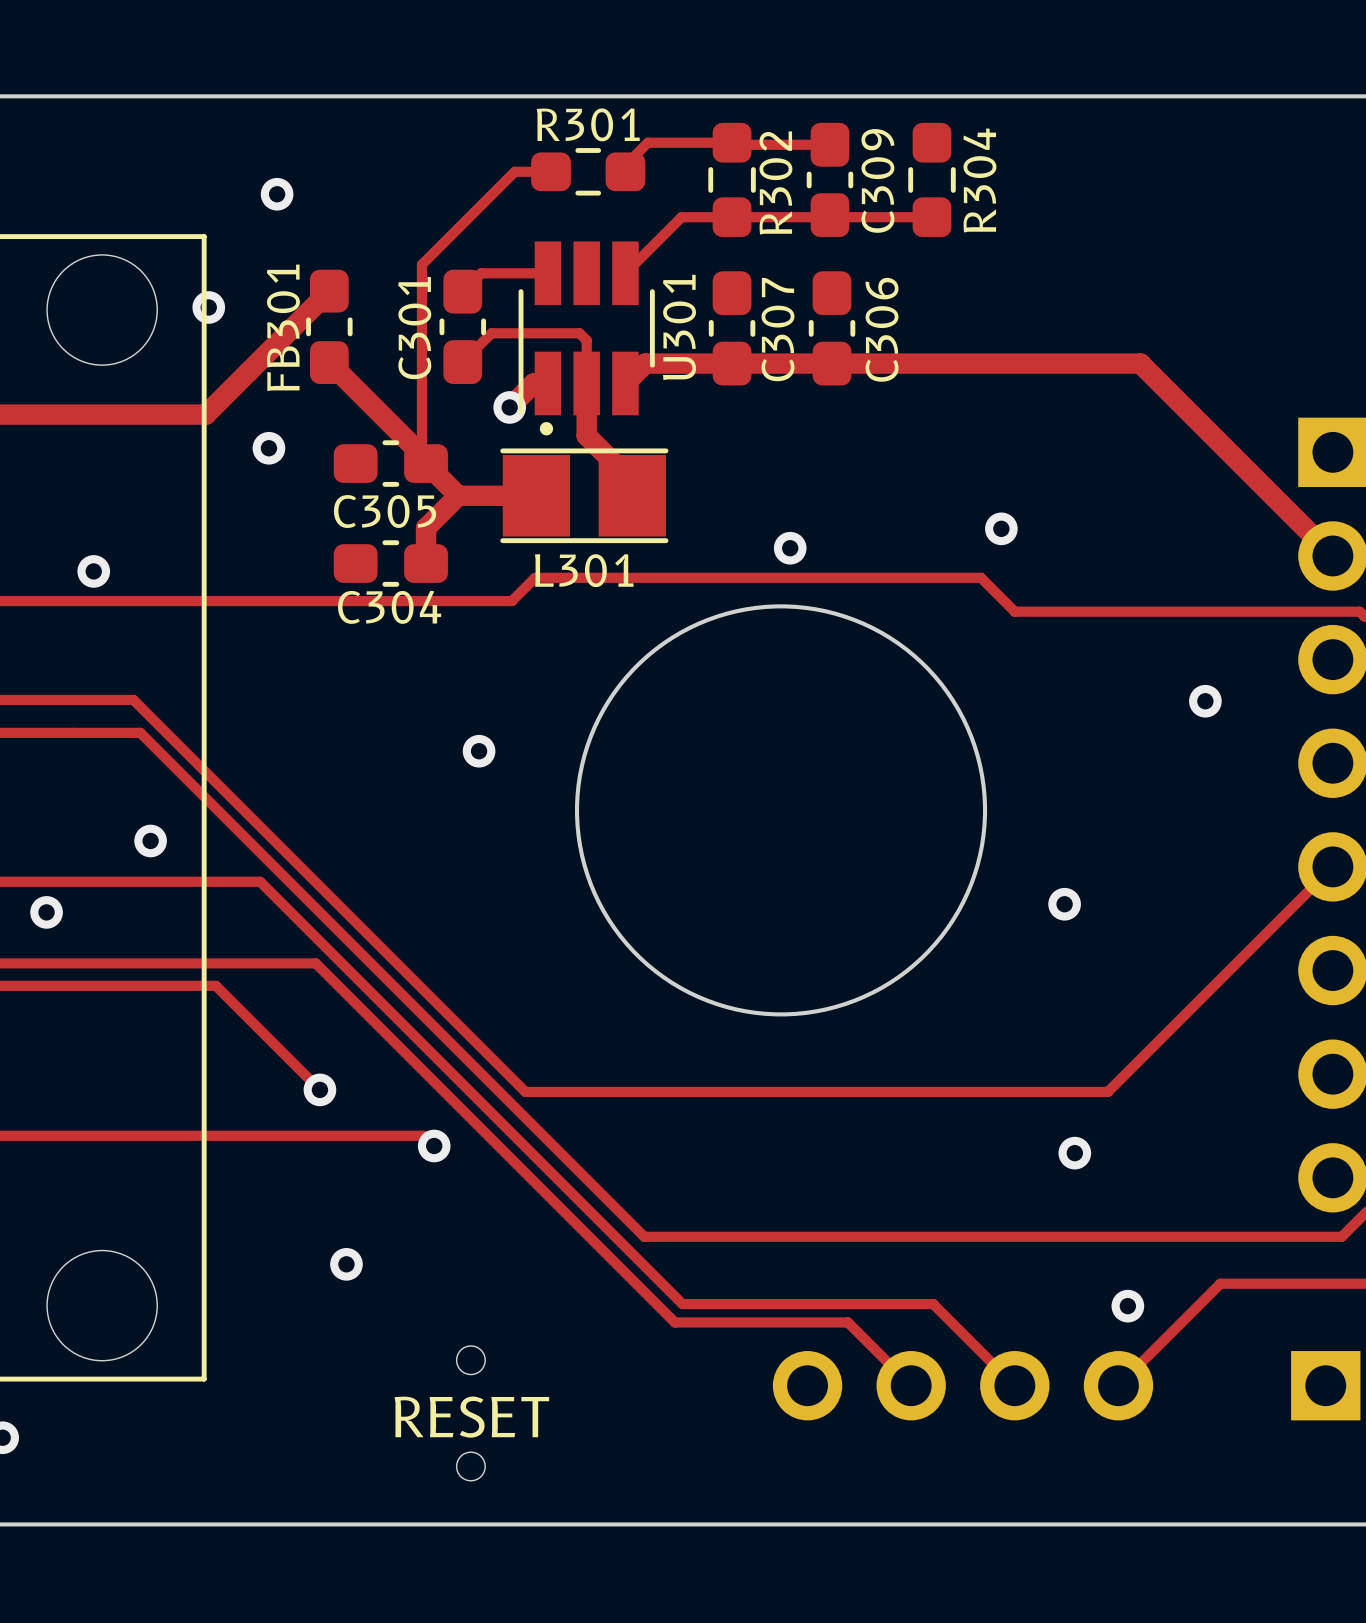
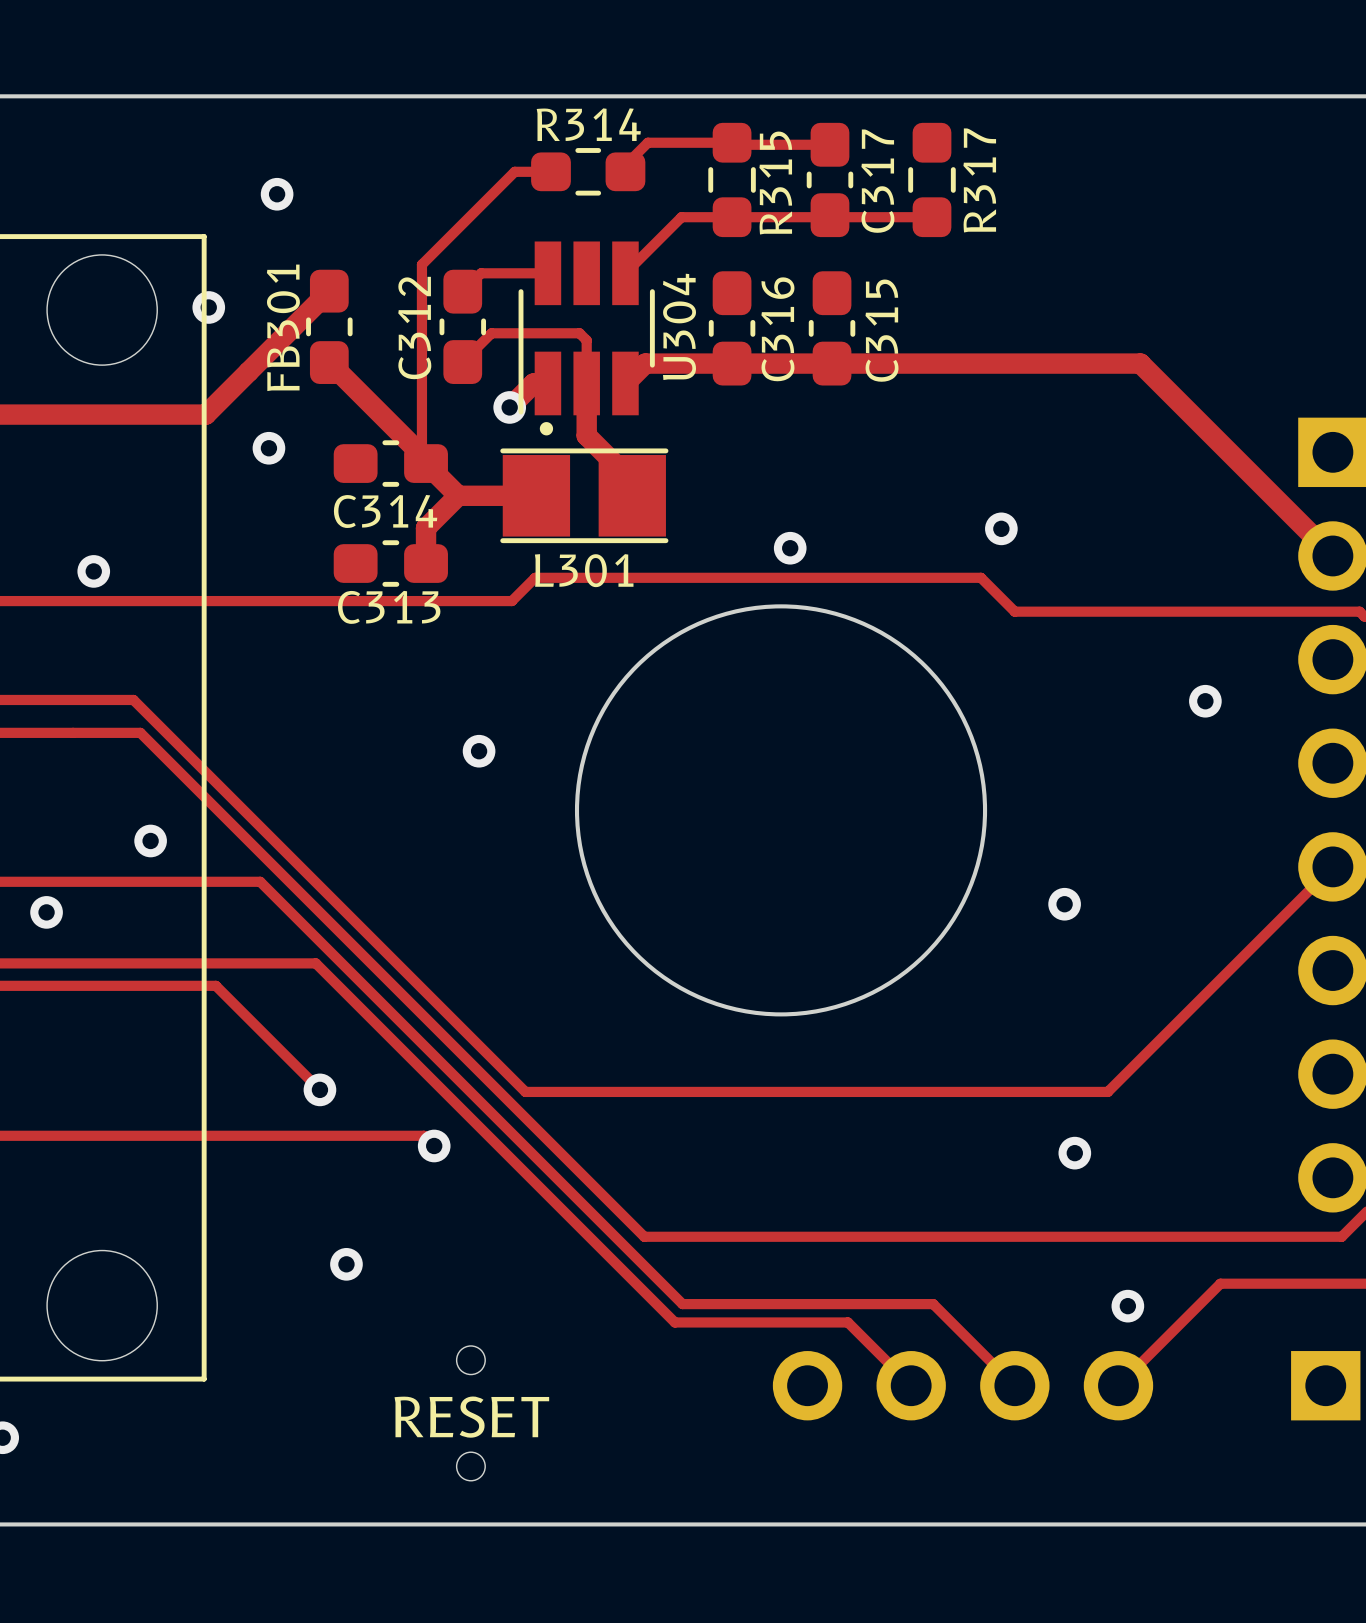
R301 name: R301 (588, 124) -> R314 (588, 124)
C309 name: C309 (877, 180) -> C317 (877, 181)
R304 name: R304 (979, 180) -> R317 (979, 180)
R302 name: R302 (775, 182) -> R315 (775, 183)
U301 name: U301 (679, 327) -> U304 (679, 326)
C301 name: C301 (414, 328) -> C312 (414, 328)
C307 name: C307 (777, 329) -> C316 (777, 329)
C306 name: C306 (882, 329) -> C315 (881, 330)
C305 name: C305 (385, 511) -> C314 (385, 511)
C304 name: C304 (389, 607) -> C313 (389, 607)

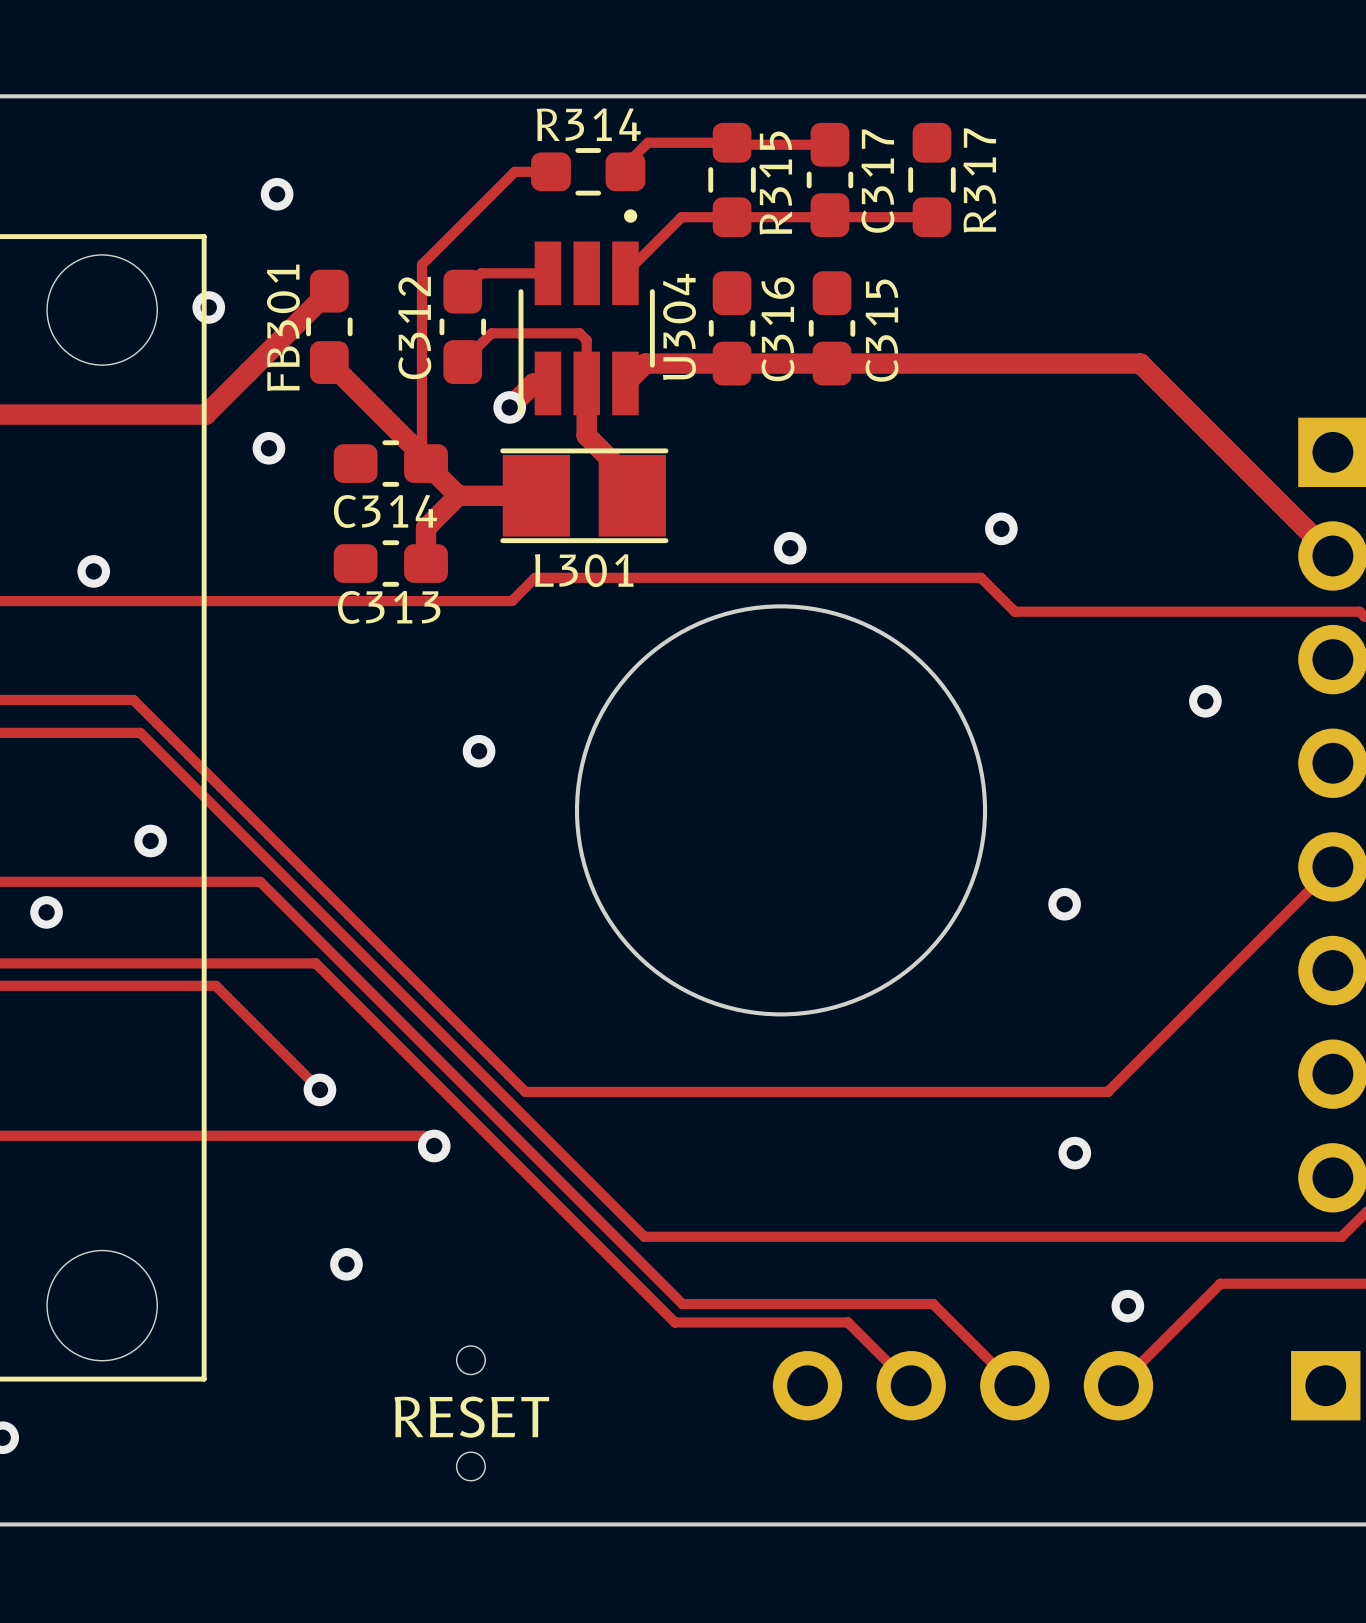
text position: . (546, 428) -> . (630, 216)

